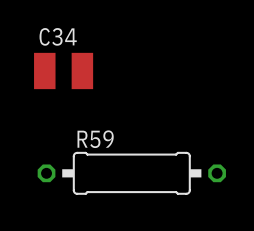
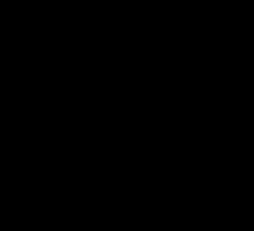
C34: (63, 70) -> none
R59: (131, 173) -> none

